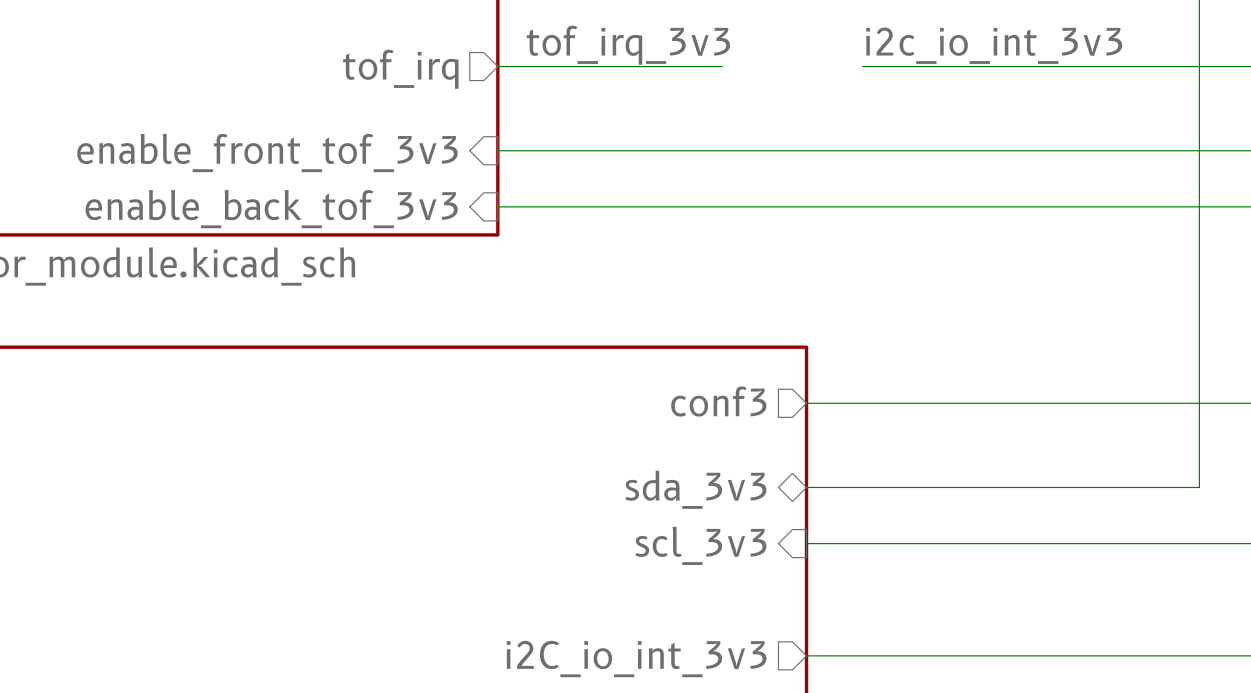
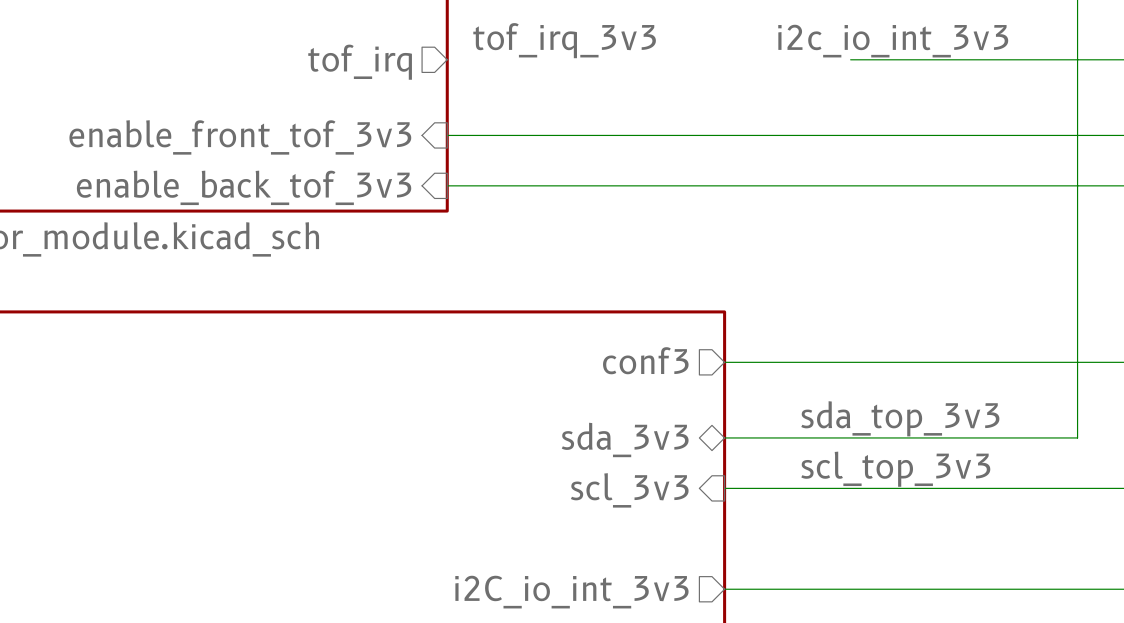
wire: (497, 66) (722, 66) -> none
wire: (862, 66) (946, 66) -> none
label: none -> sda_top_3v3 (900, 418)
label: none -> scl_top_3v3 (895, 469)

